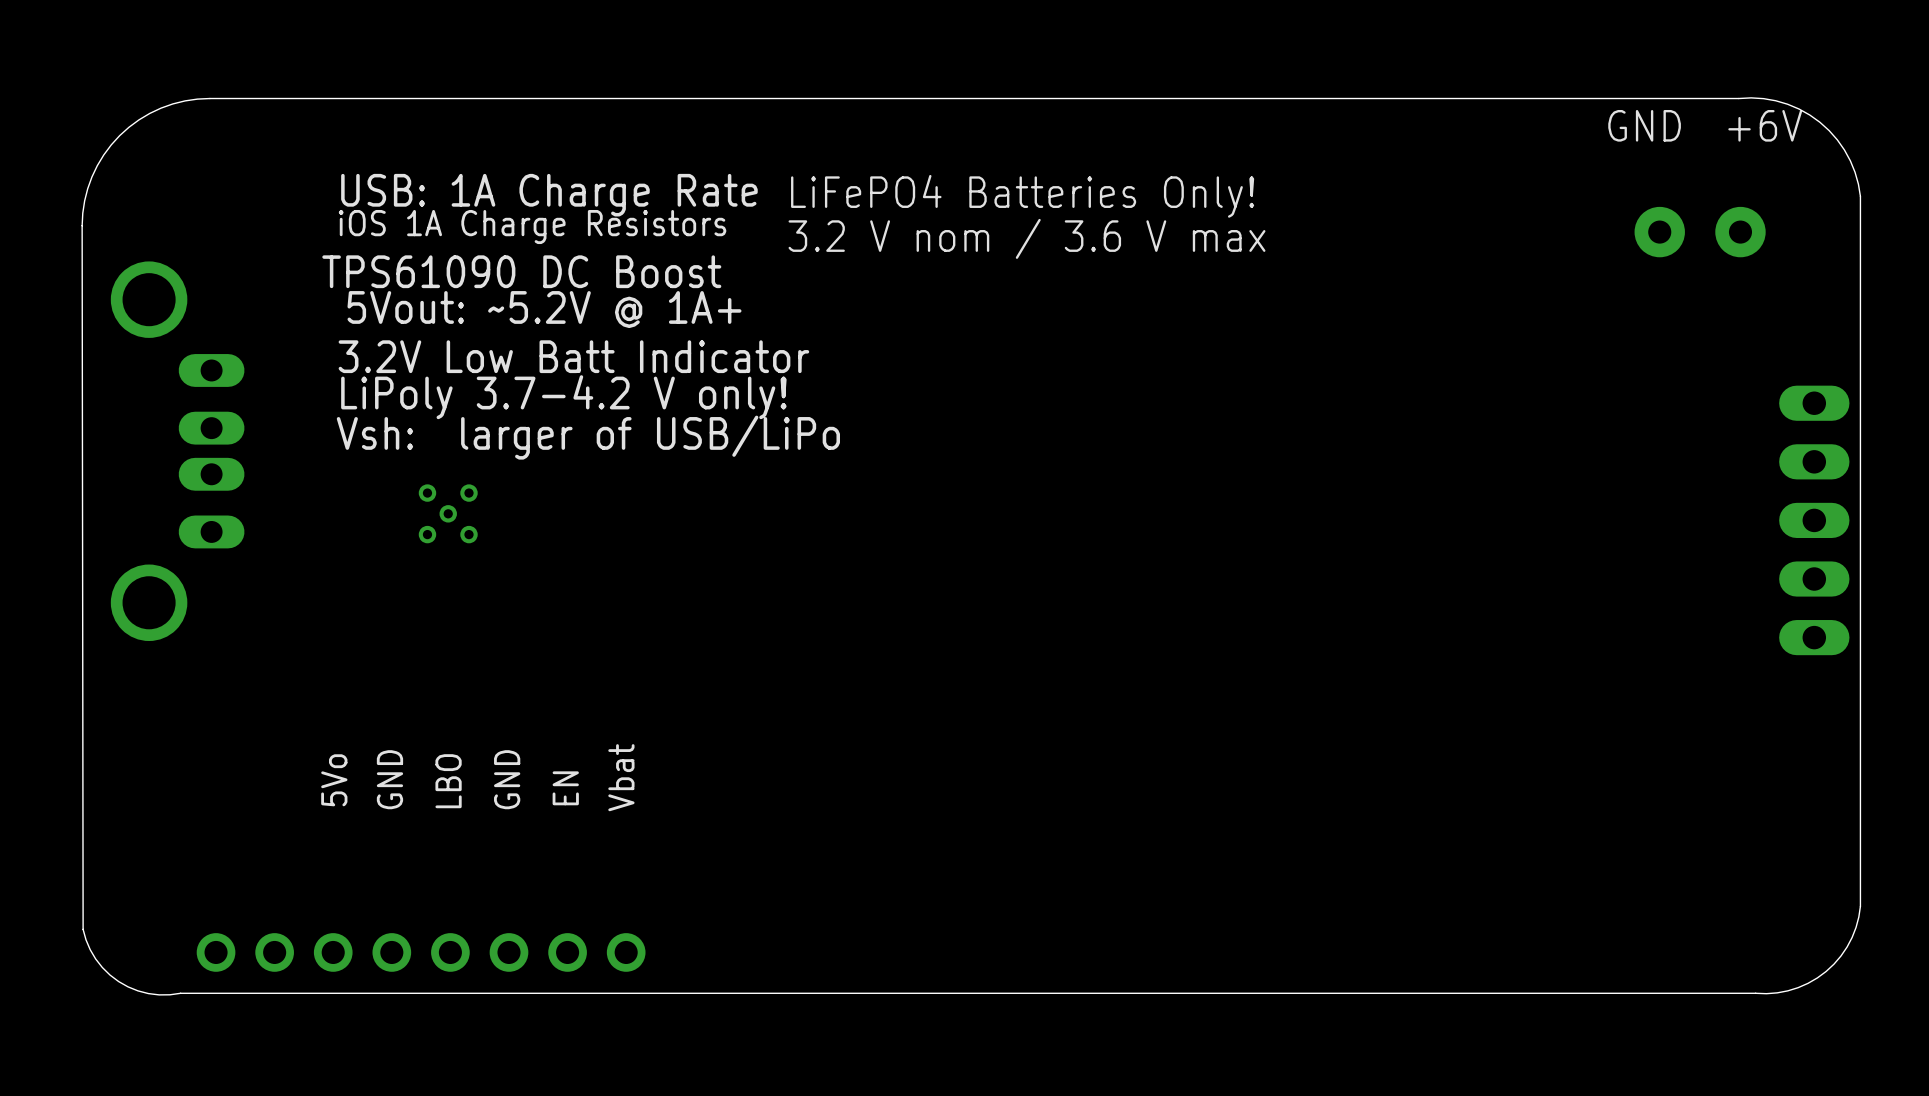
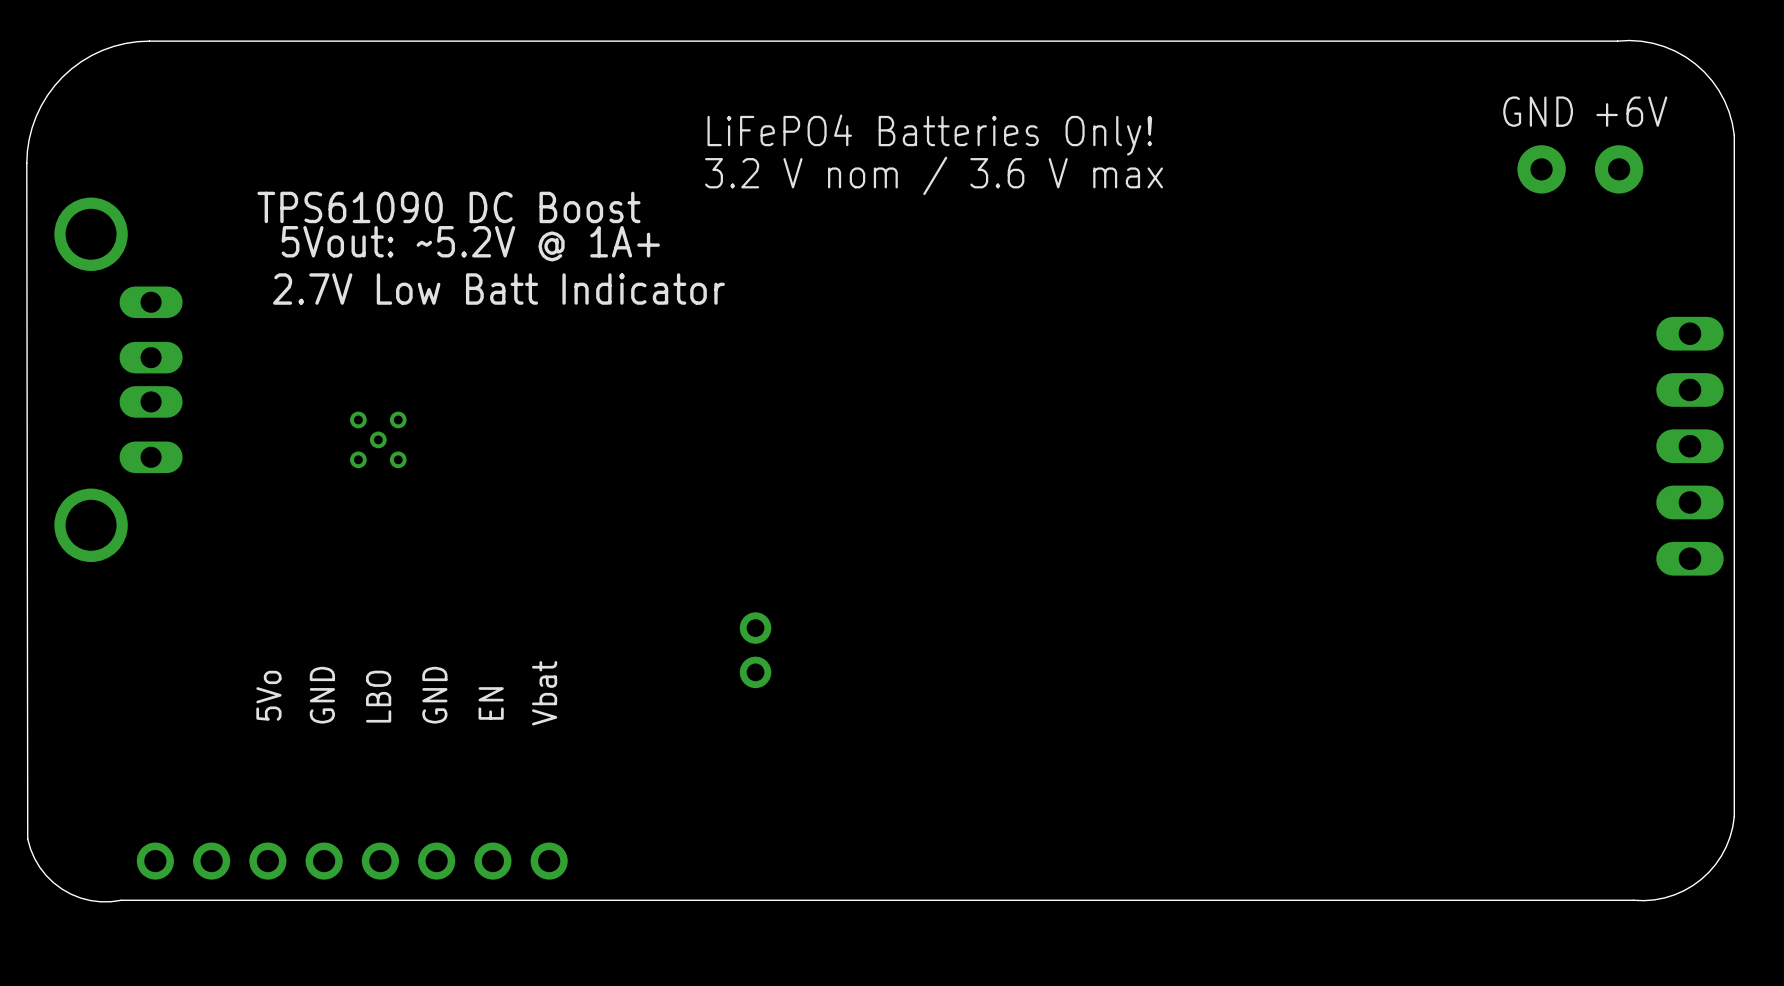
text position: GND (1644, 125) -> GND (1538, 111)
text position: +6V (1765, 125) -> +6V (1631, 111)
text: USB: 1A Charge Rate (549, 195) -> none
text: iOS 1A Charge Resistors (532, 227) -> none
text: 3.2V Low Batt Indicator (573, 356) -> 2.7V Low Batt Indicator (498, 289)
text: LiPoly 3.7-4.2 V only! (563, 397) -> none
text: Vsh: larger of USB/LiPo (588, 437) -> none
part: none -> (755, 650)

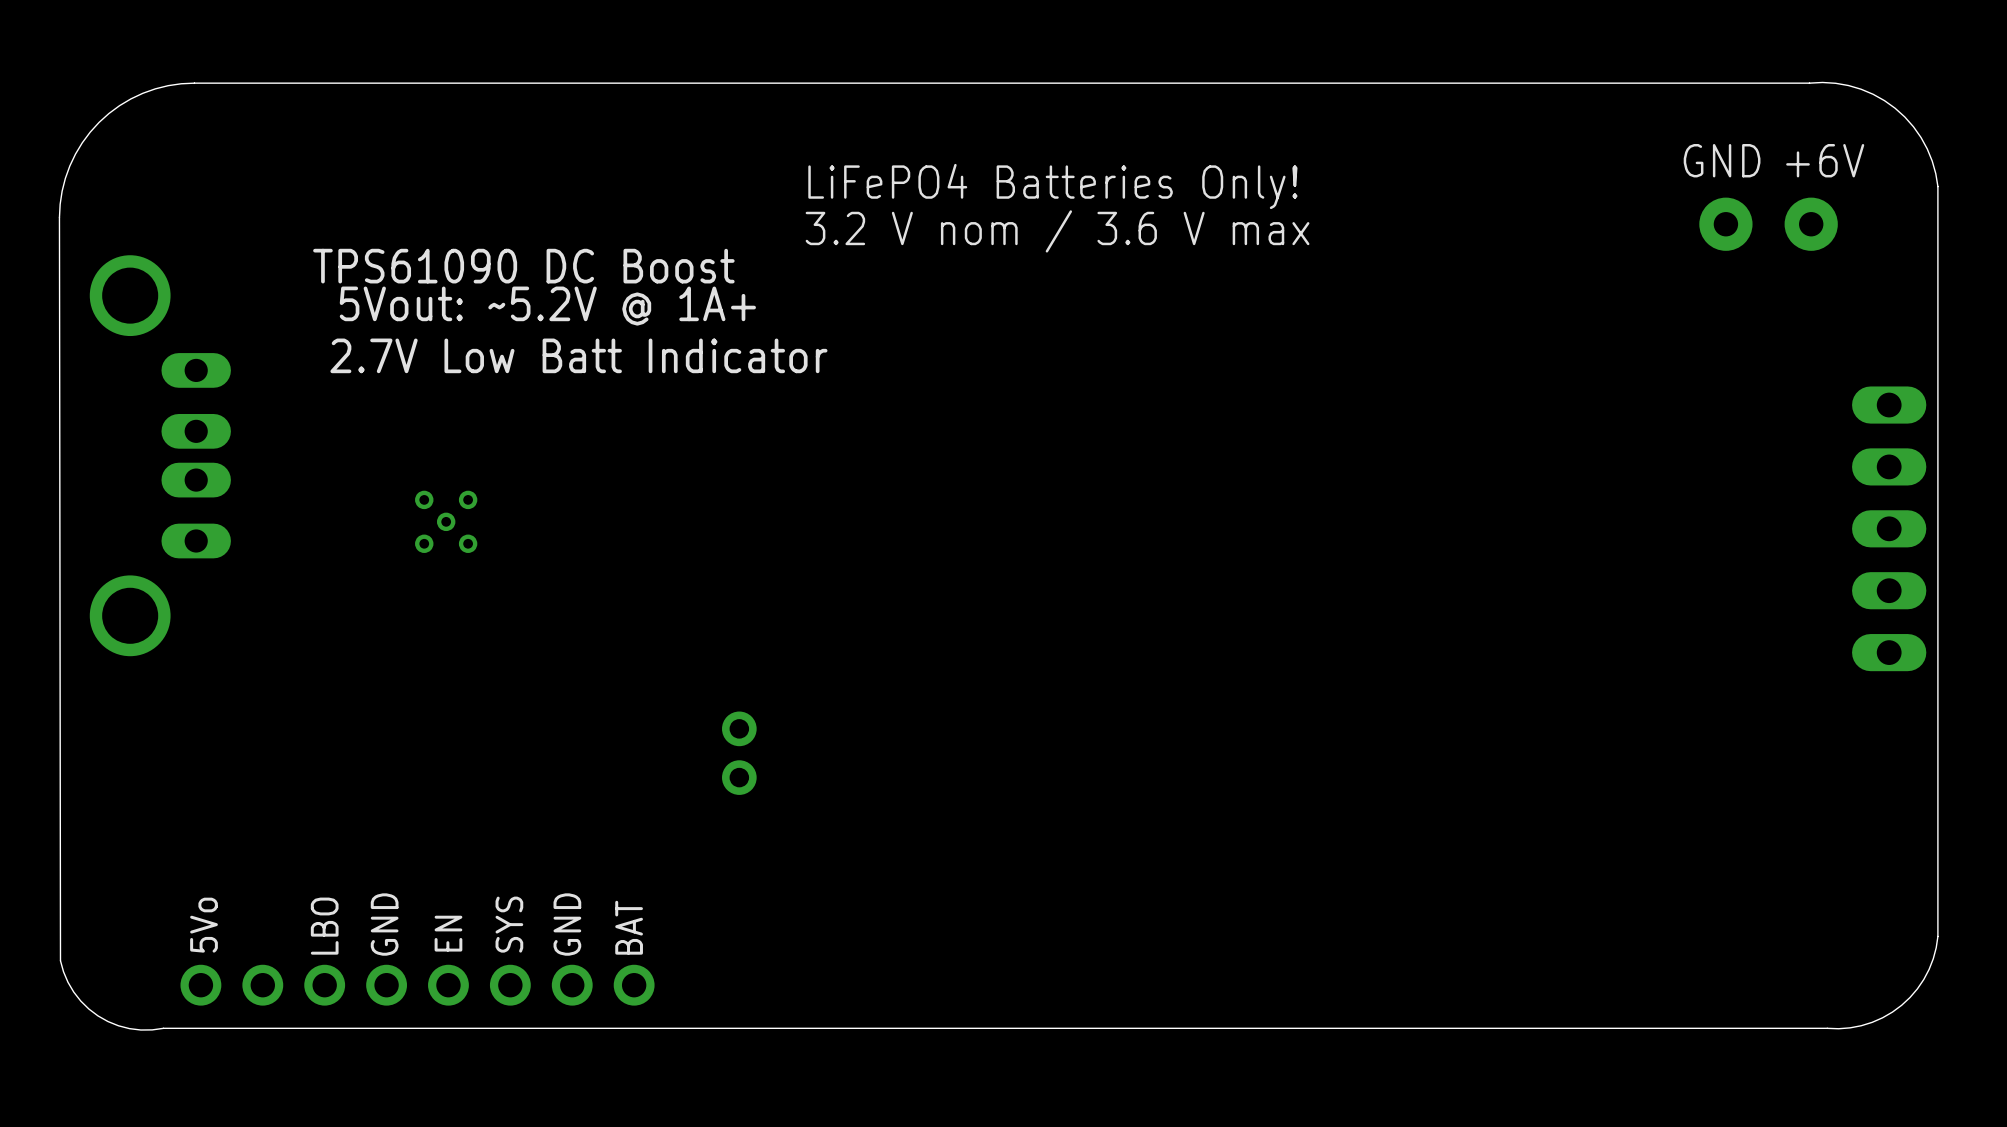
part position: (755, 650) -> (739, 753)
text: Vbat (544, 693) -> none
text position: 5Vo (268, 695) -> 5Vo (204, 925)
text: GND (322, 695) -> none
text: GND (434, 695) -> none
text position: LBO (378, 696) -> LBO (324, 926)
text position: EN (491, 703) -> EN (448, 933)
text: none -> GND (384, 924)
text: none -> GND (567, 924)
text: none -> SYS (509, 924)
text: none -> BAT (629, 927)

